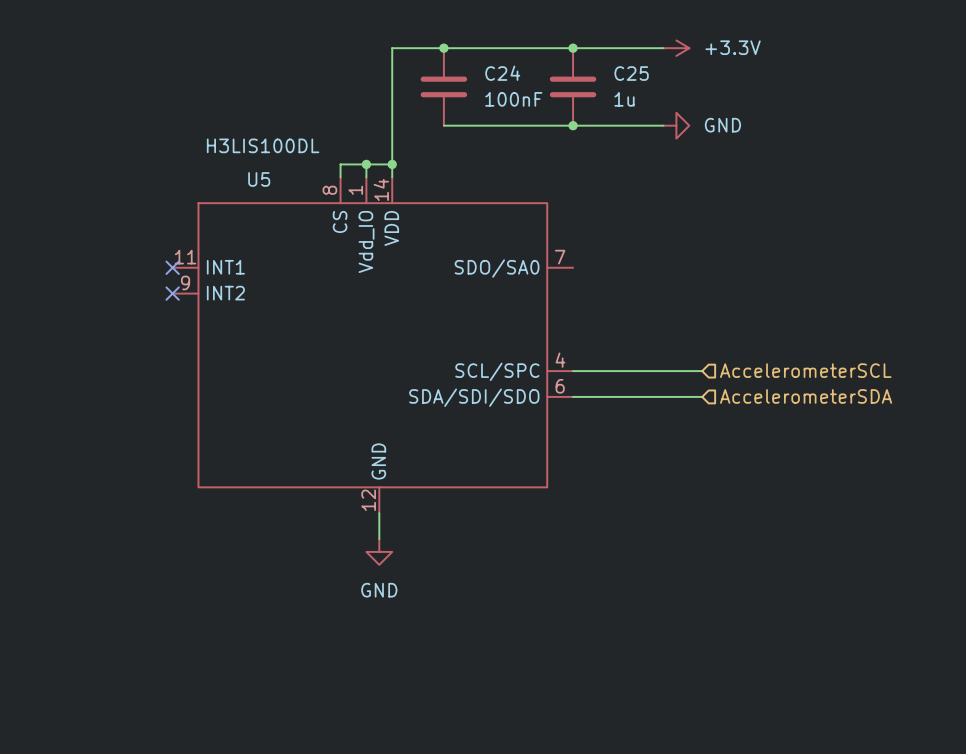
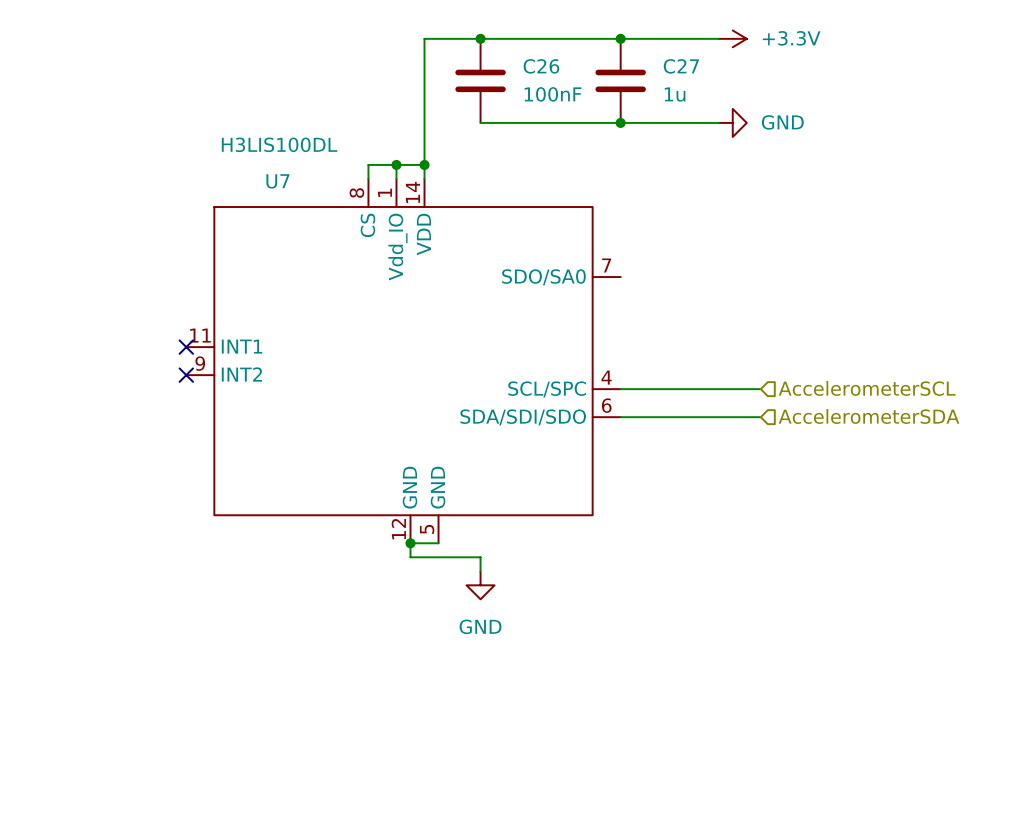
C24 name: C24 (502, 73) -> C26 (541, 66)
C25 name: C25 (631, 73) -> C27 (681, 66)
no-connect mark: (172, 267) -> none
no-connect mark: (172, 293) -> none
no-connect mark: none -> (186, 347)
U5: H3LIS100DL (372, 345) -> none
U7: none -> H3LIS100DL (403, 361)
no-connect mark: none -> (186, 375)
wire: none -> (410, 543) (438, 543)
junction: none -> (410, 543)
wire: (379, 526) (379, 539) -> (410, 557) (480, 557) (480, 571)
power symbol position: GND (379, 551) -> GND (480, 585)

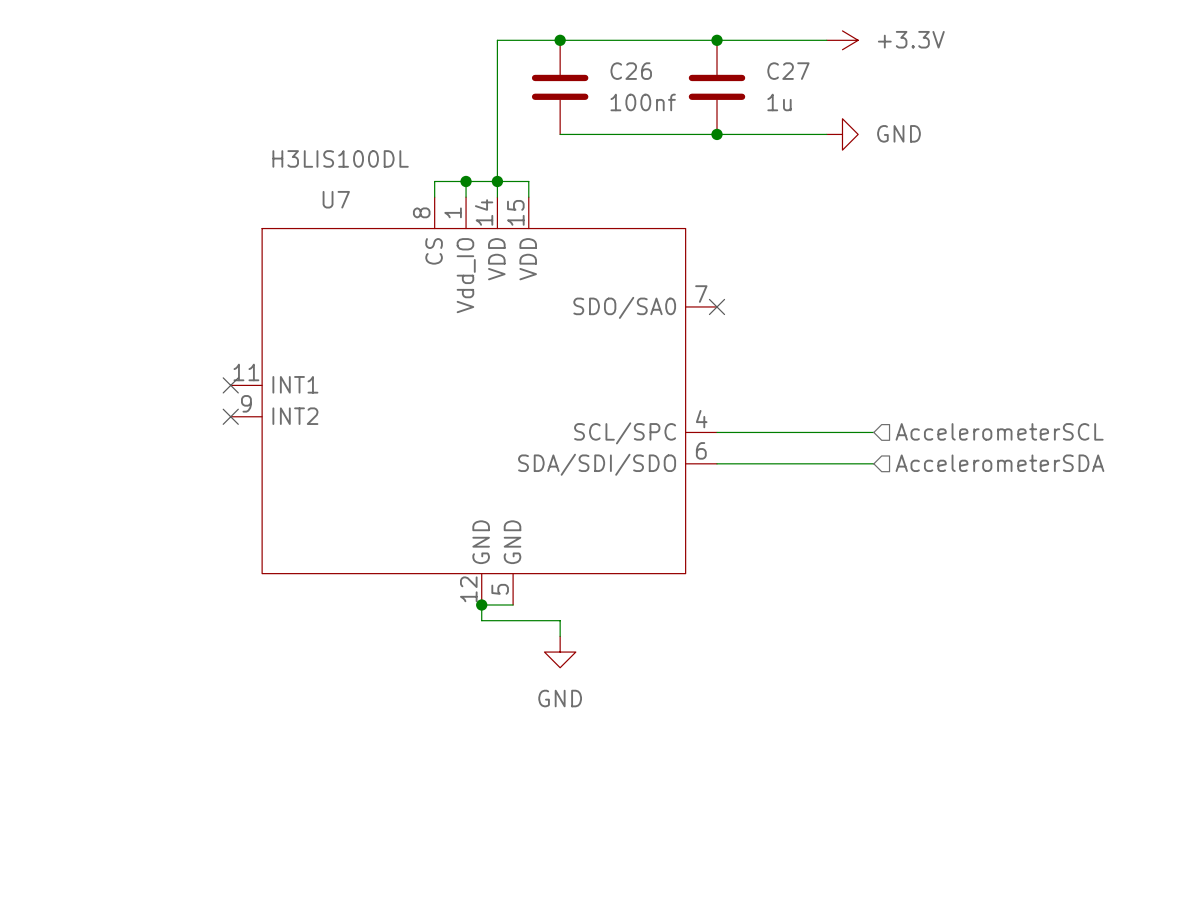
C26 value: 100nF (553, 94) -> 100nf (643, 102)
wire: none -> (497, 181) (528, 181) (528, 197)
U7 symbol: [186, 178, 621, 544] -> [230, 197, 718, 605]
no-connect mark: none -> (717, 306)

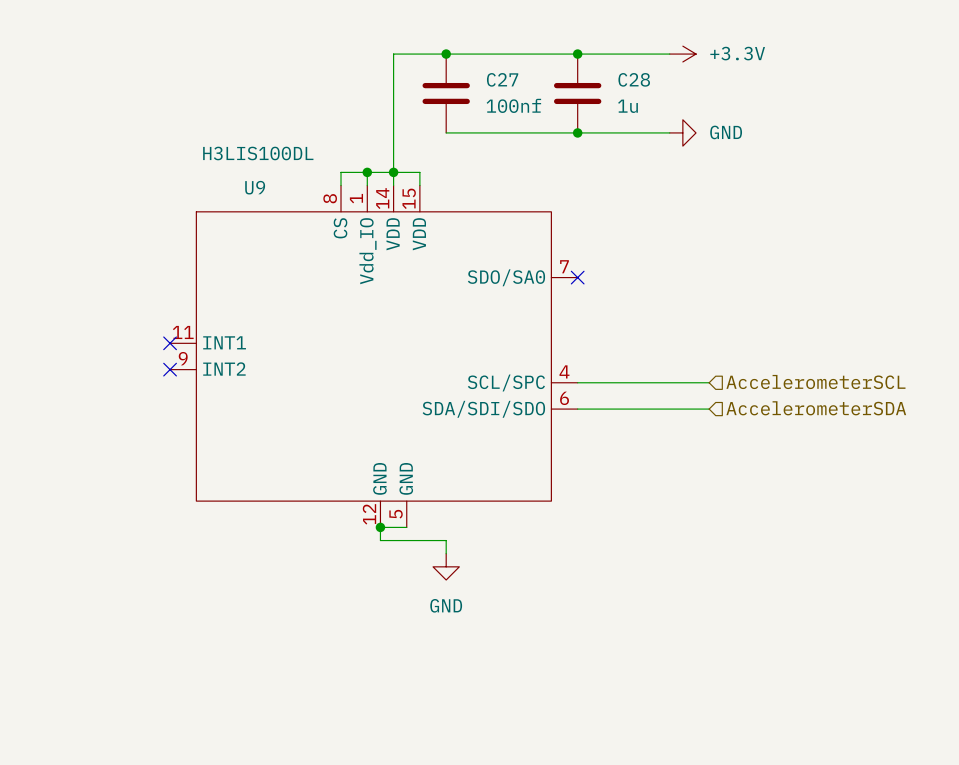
C26 name: C26 (631, 71) -> C27 (502, 79)
C27 name: C27 (788, 71) -> C28 (634, 79)
U7 name: U7 (336, 199) -> U9 (255, 187)

